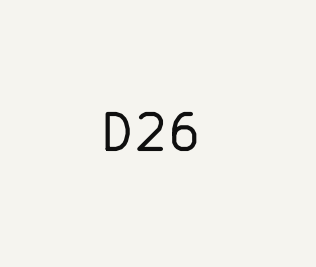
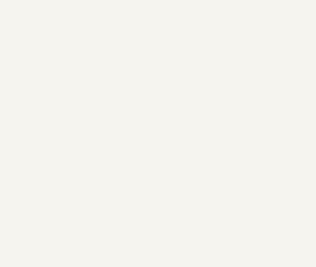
label: D26 (150, 131) -> none

